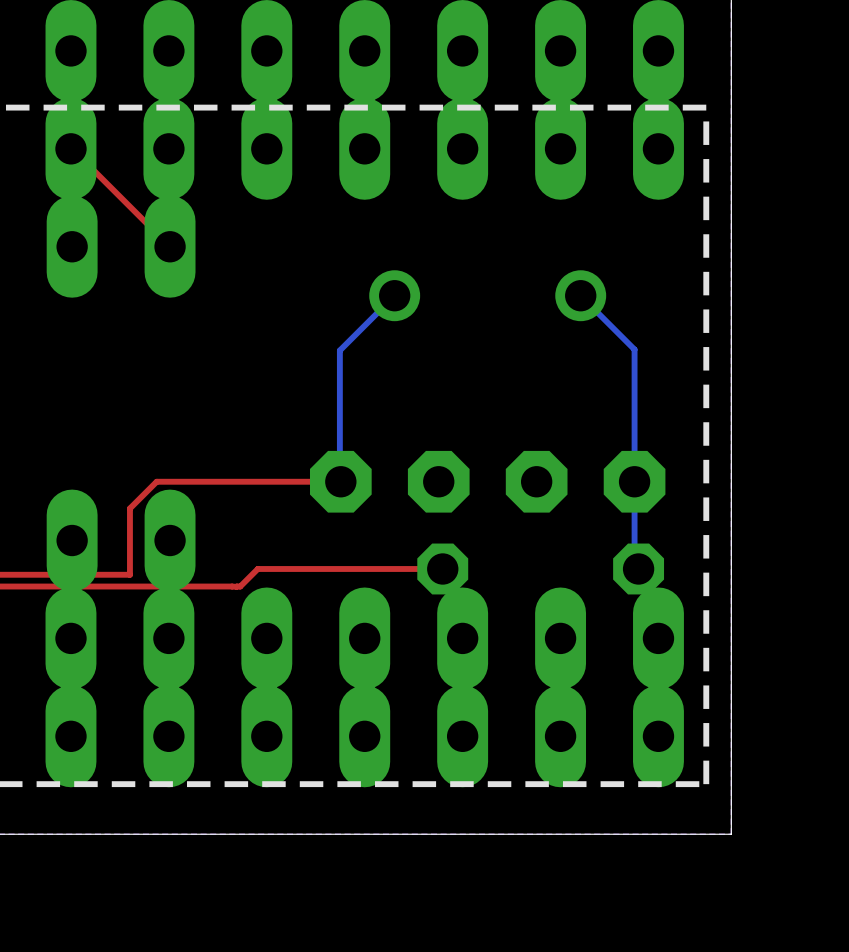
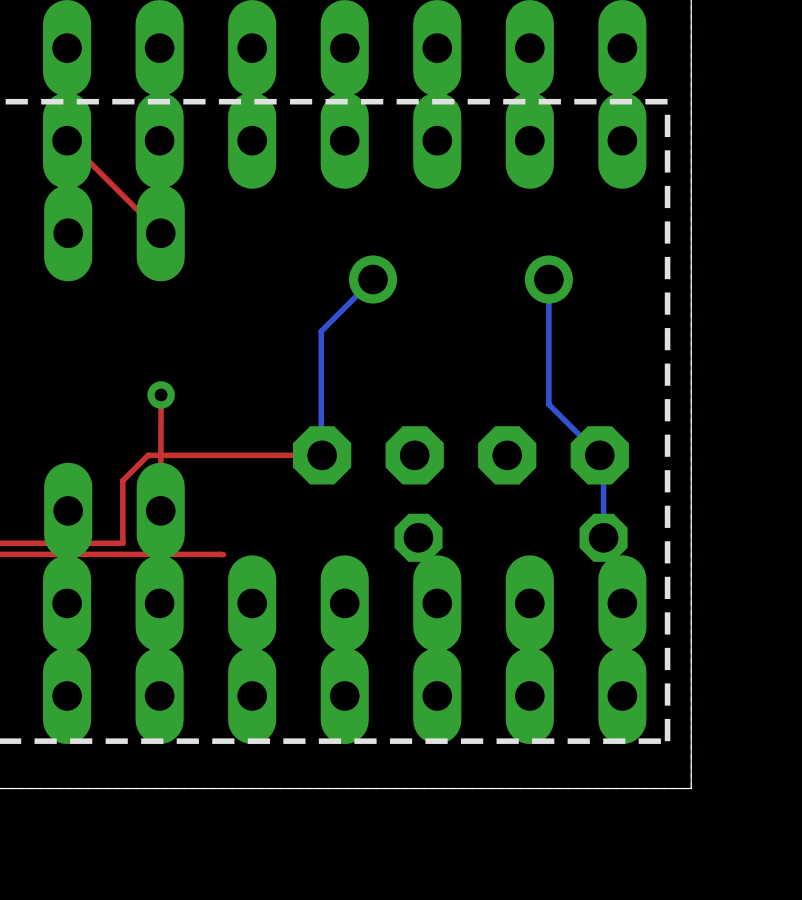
bottom track: (580, 295) (634, 349) (634, 564) (638, 568) -> (548, 279) (548, 404) (603, 459) (603, 537)
top track: none -> (161, 395) (160, 510)
via: none -> (161, 395)
top track: (442, 568) (257, 568) (240, 586) (236, 586) -> none

